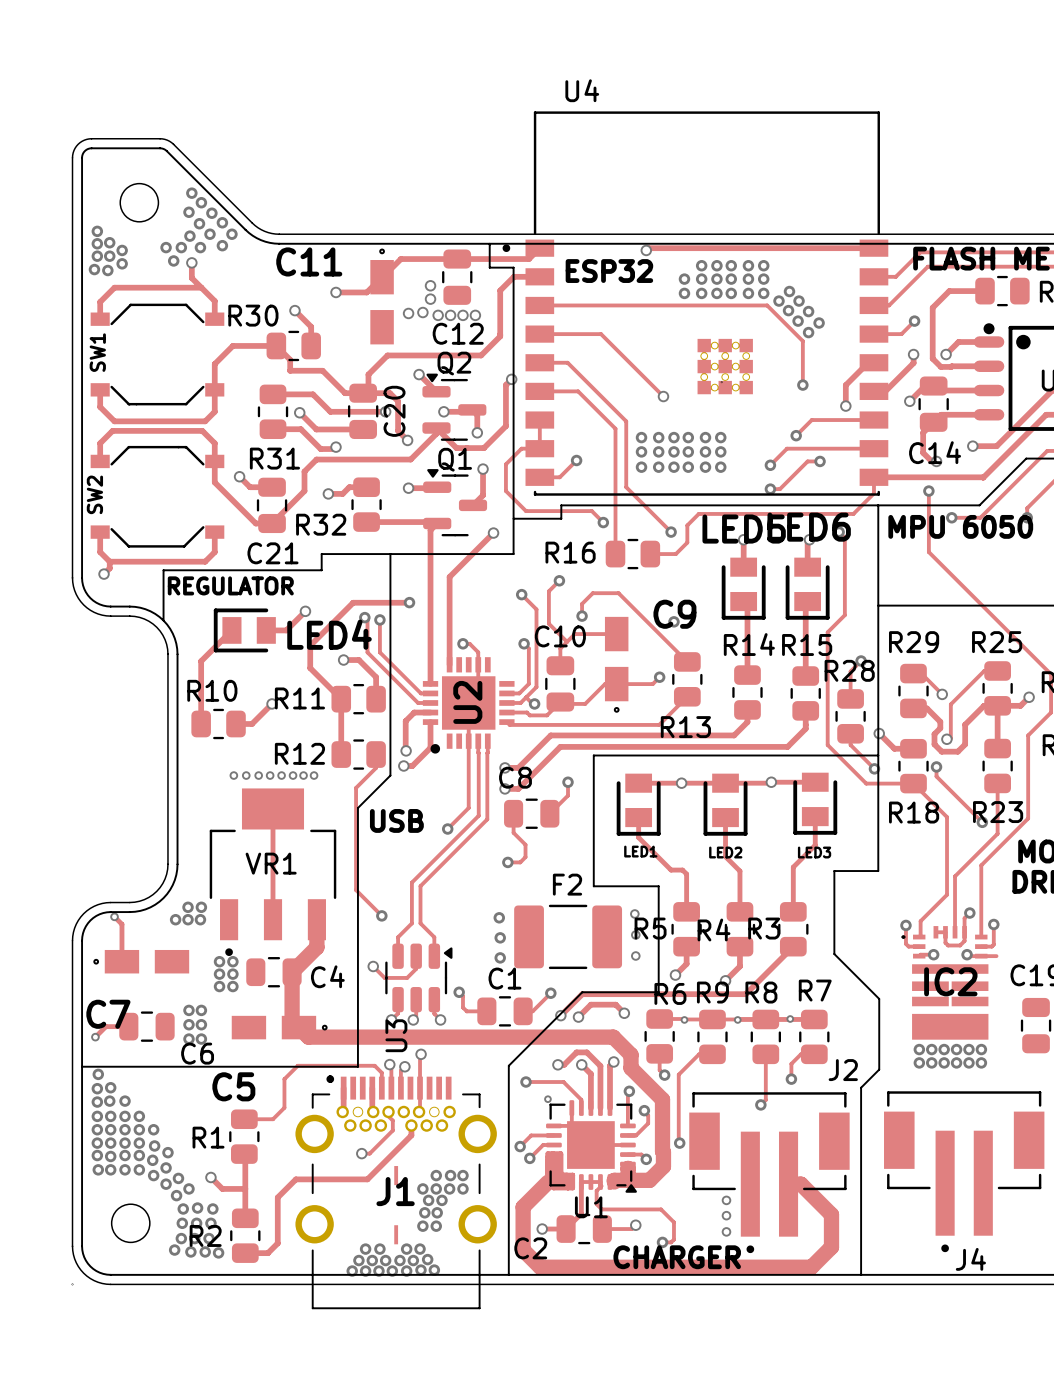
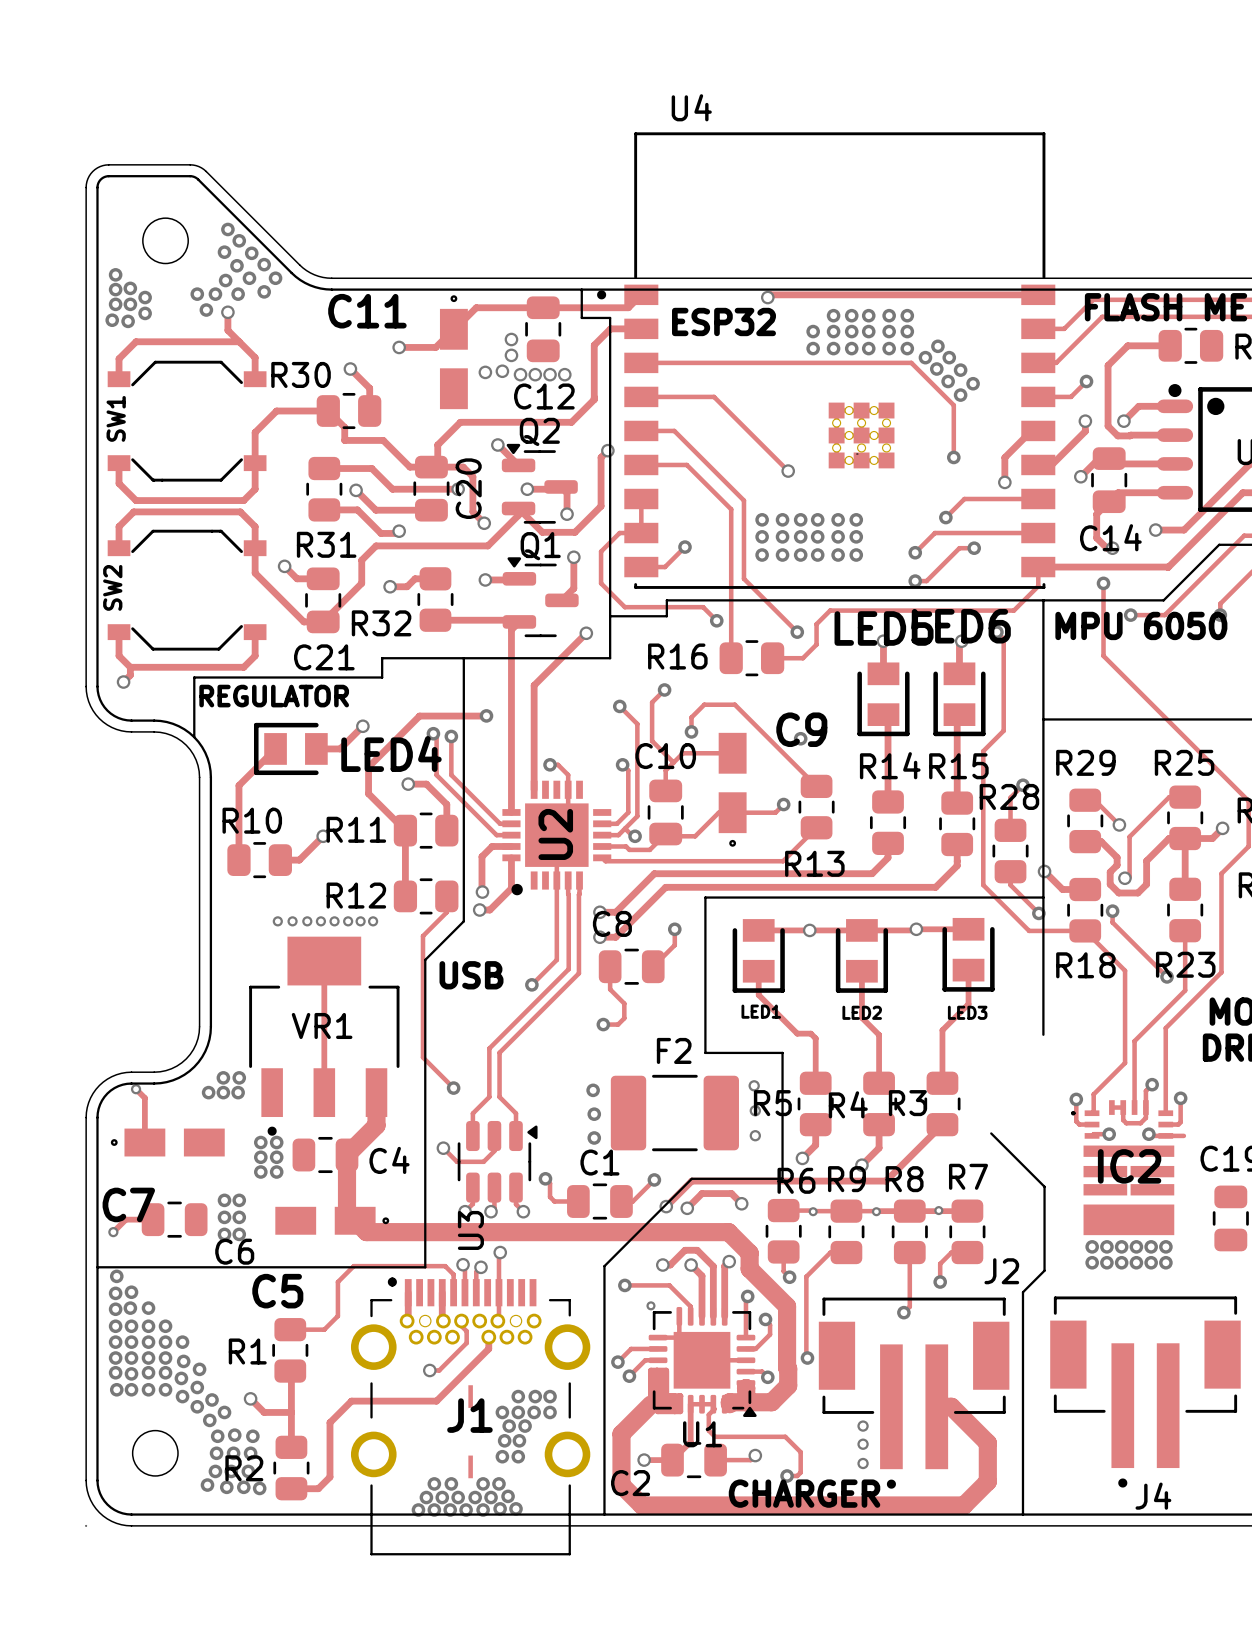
line: (878, 871) (834, 871) (834, 954) -> none

